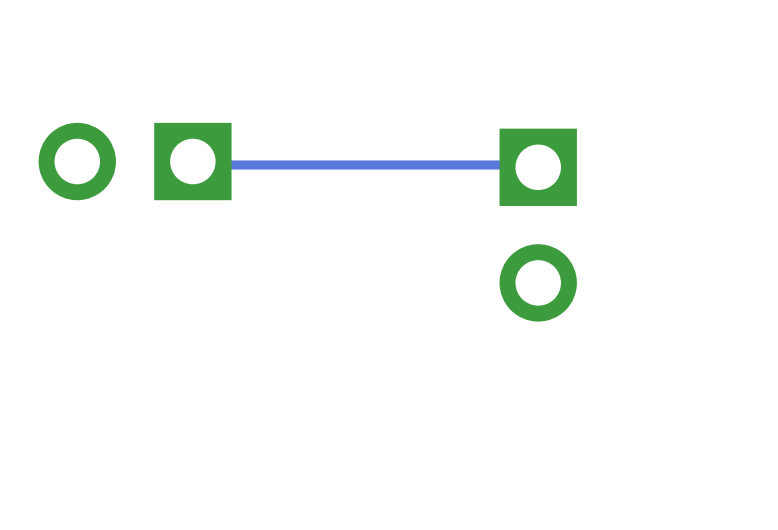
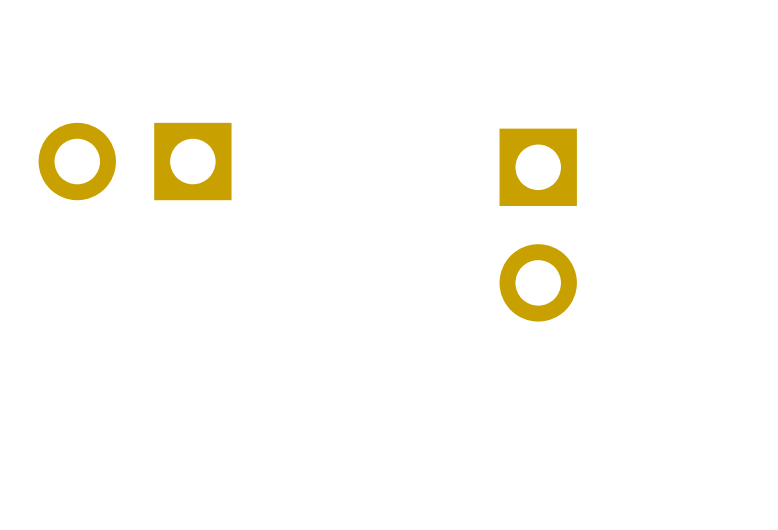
track: (192, 161) (196, 164) (535, 164) (538, 167) -> none

